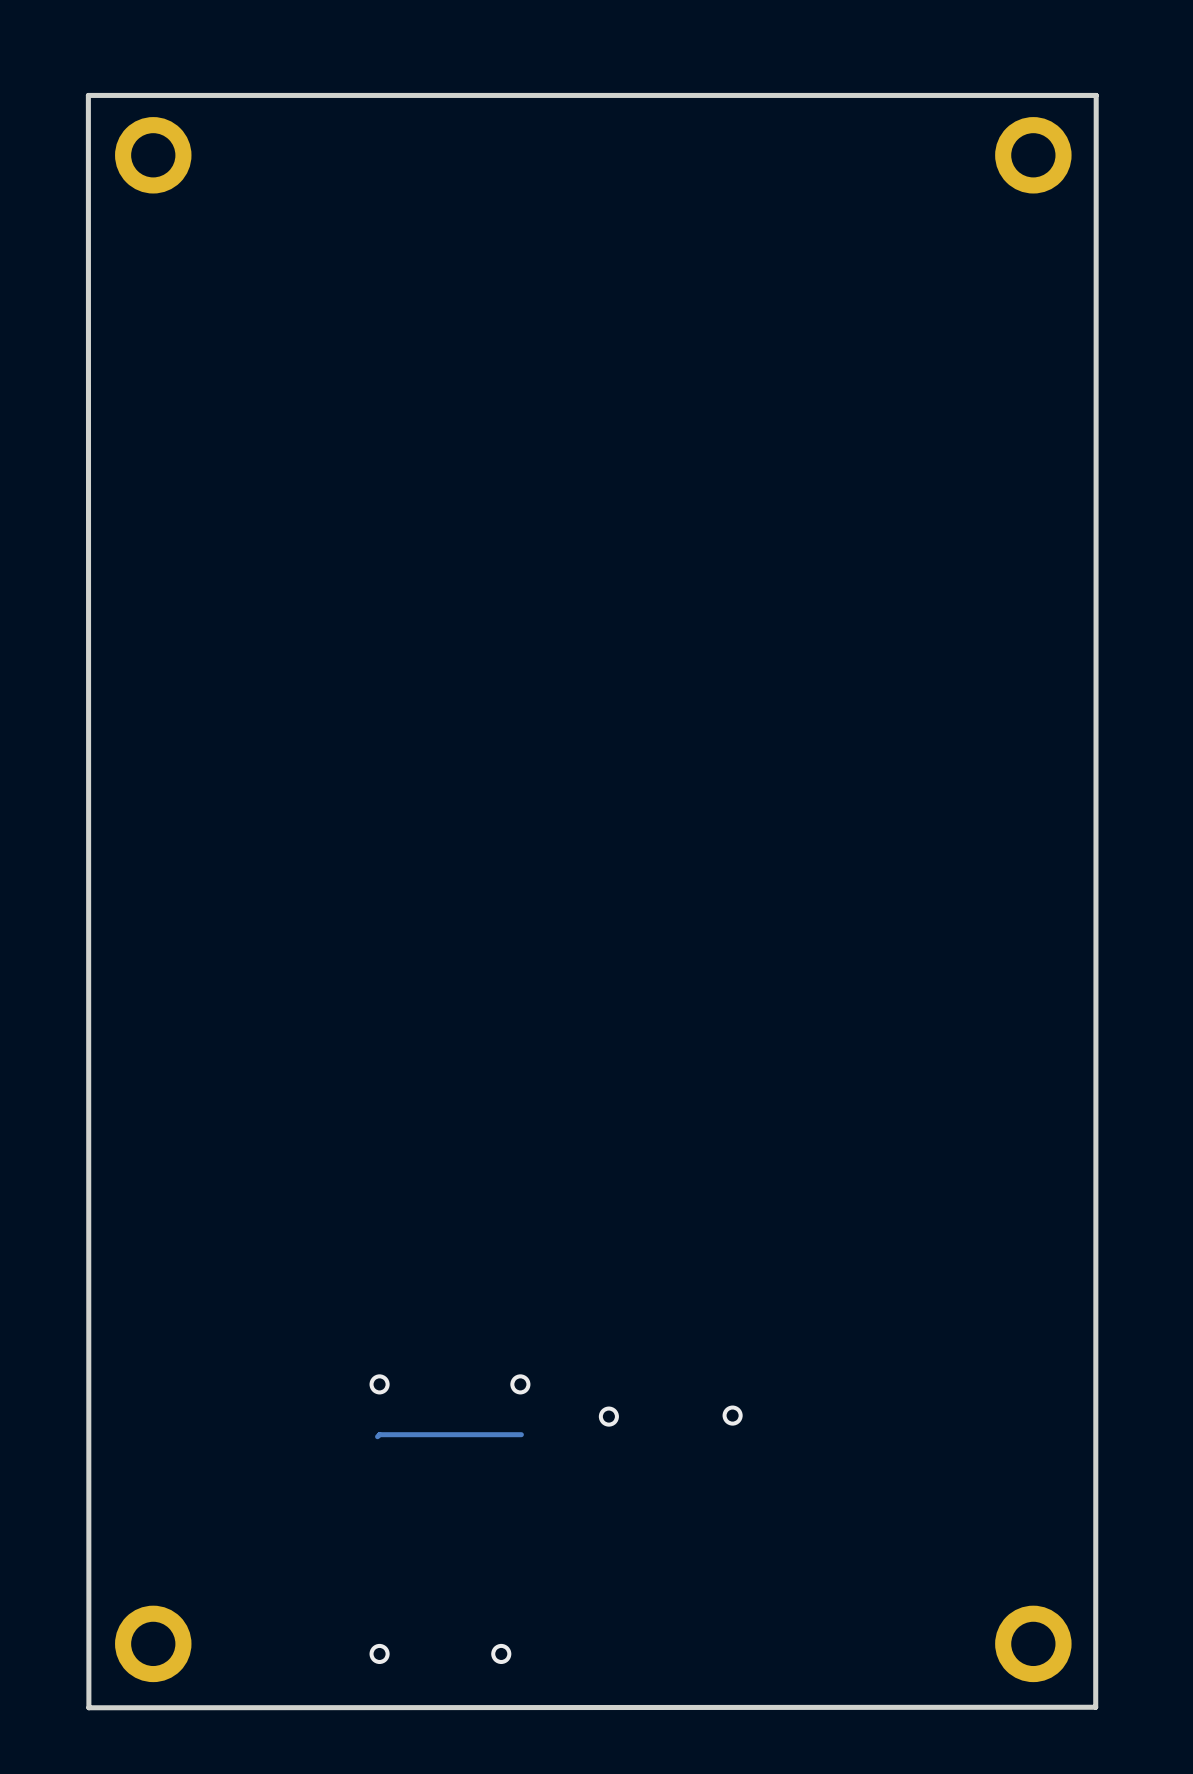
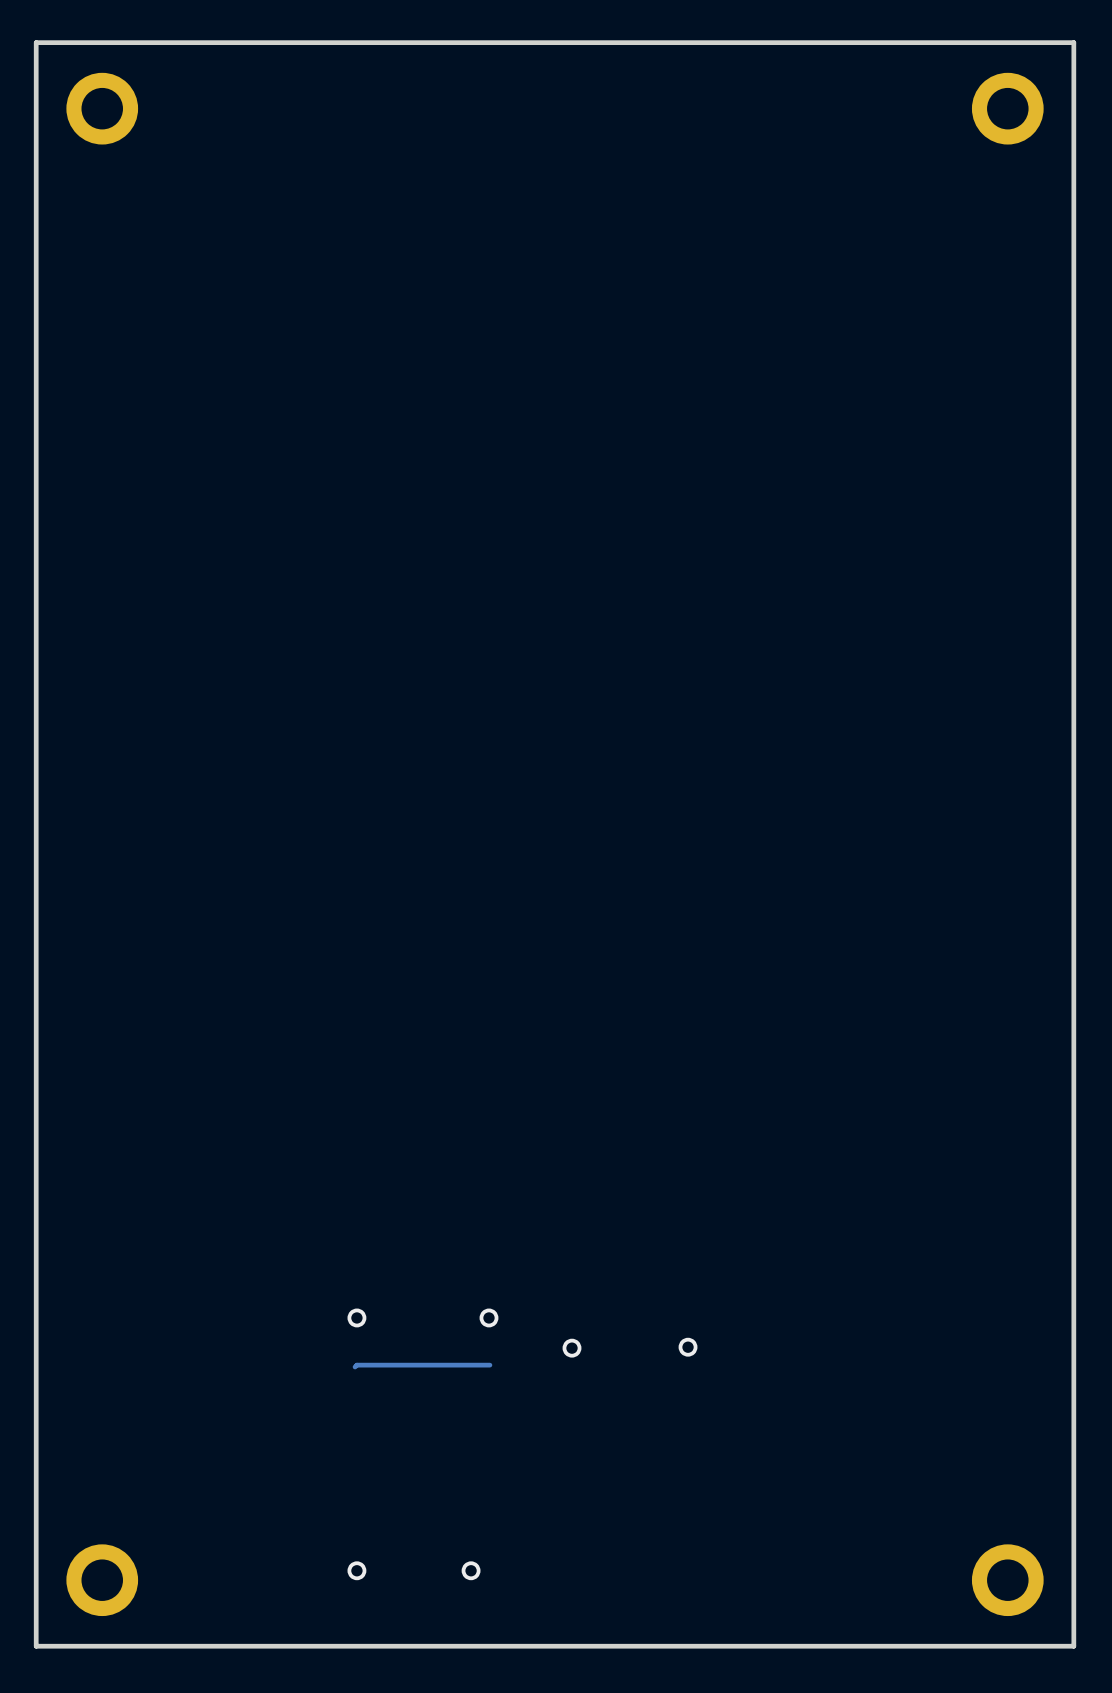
board edge: (1096, 95) (1095, 1707) (88, 1707) (88, 95) (1096, 95) -> (1073, 42) (1073, 1646) (36, 1646) (36, 42) (1073, 42)
part position: (153, 155) -> (102, 108)
part position: (1033, 155) -> (1007, 108)
part position: (153, 1643) -> (102, 1580)
part position: (1033, 1643) -> (1007, 1580)

